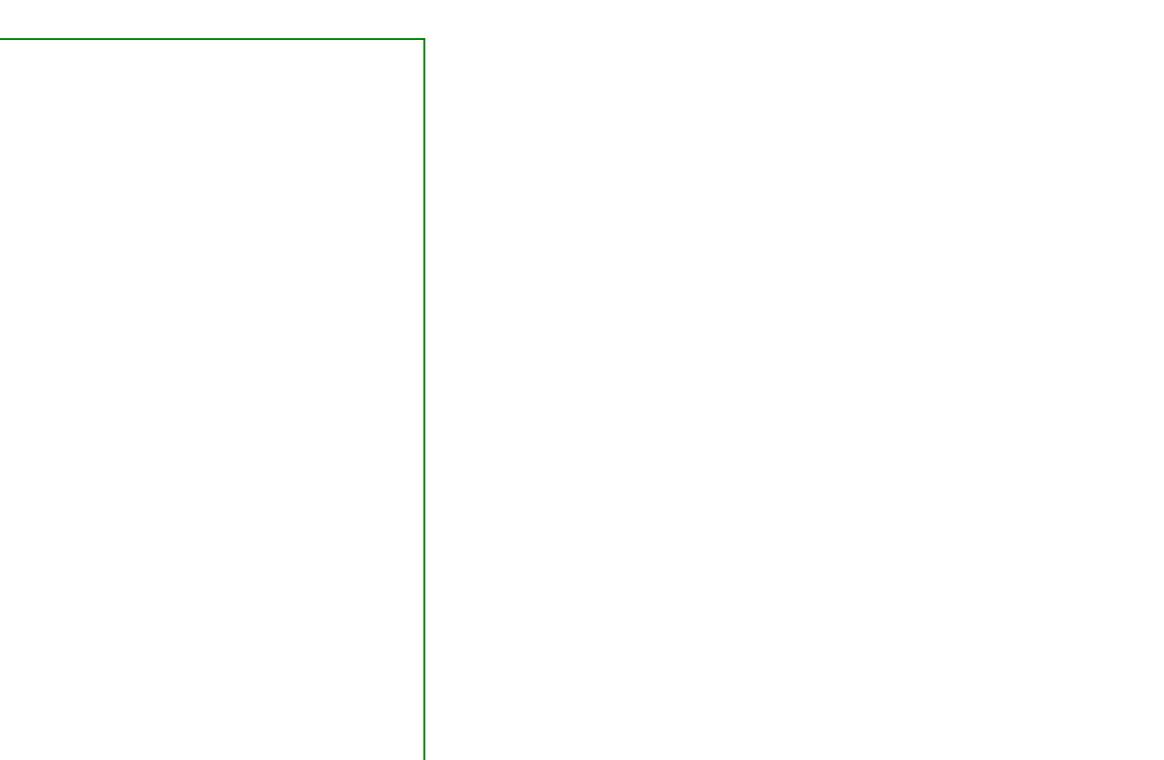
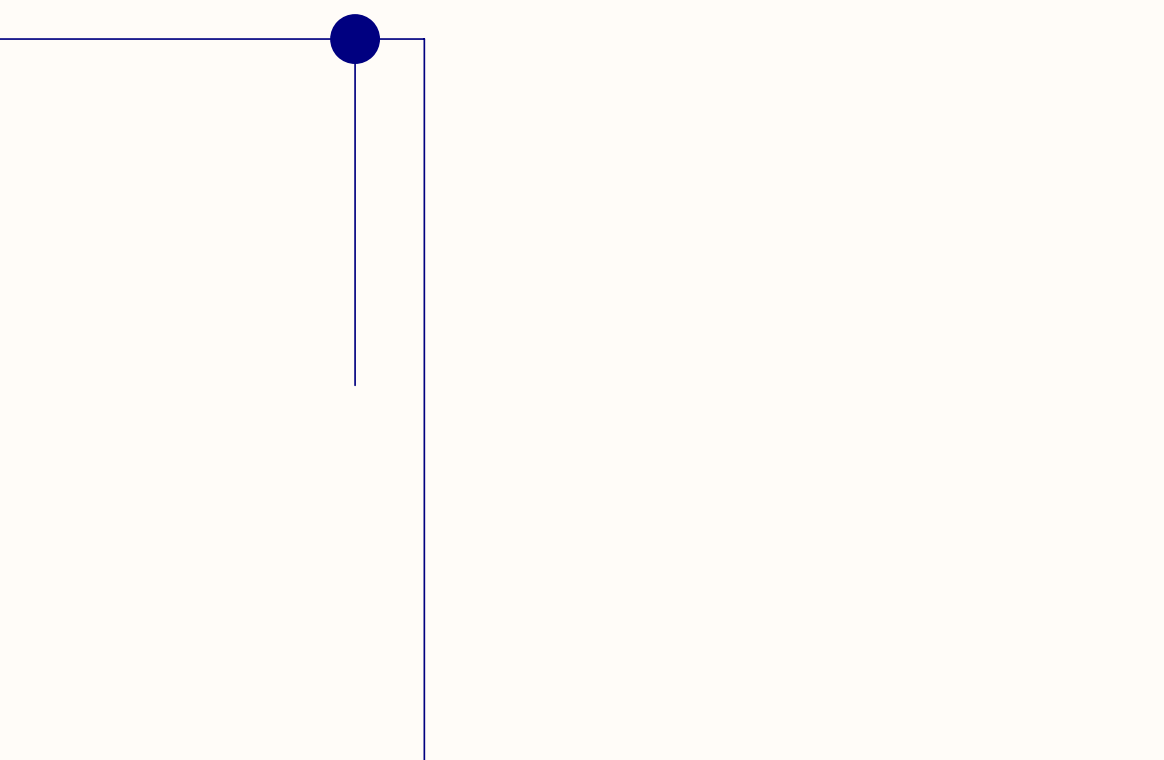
wire: none -> (355, 39) (355, 385)
junction: none -> (355, 39)

